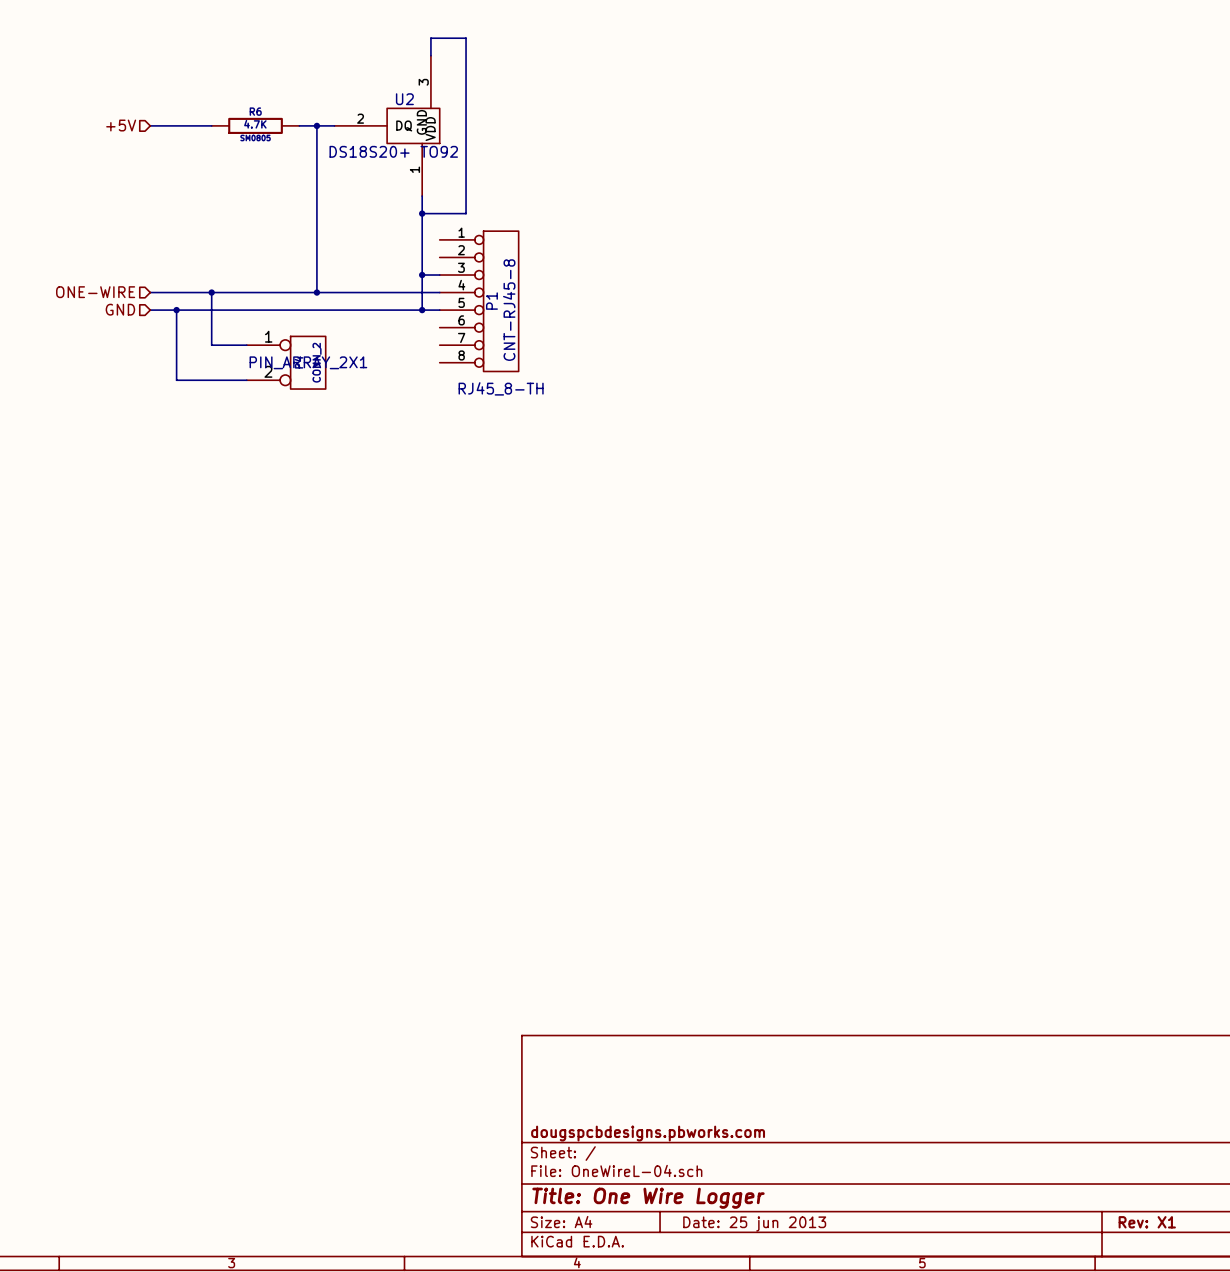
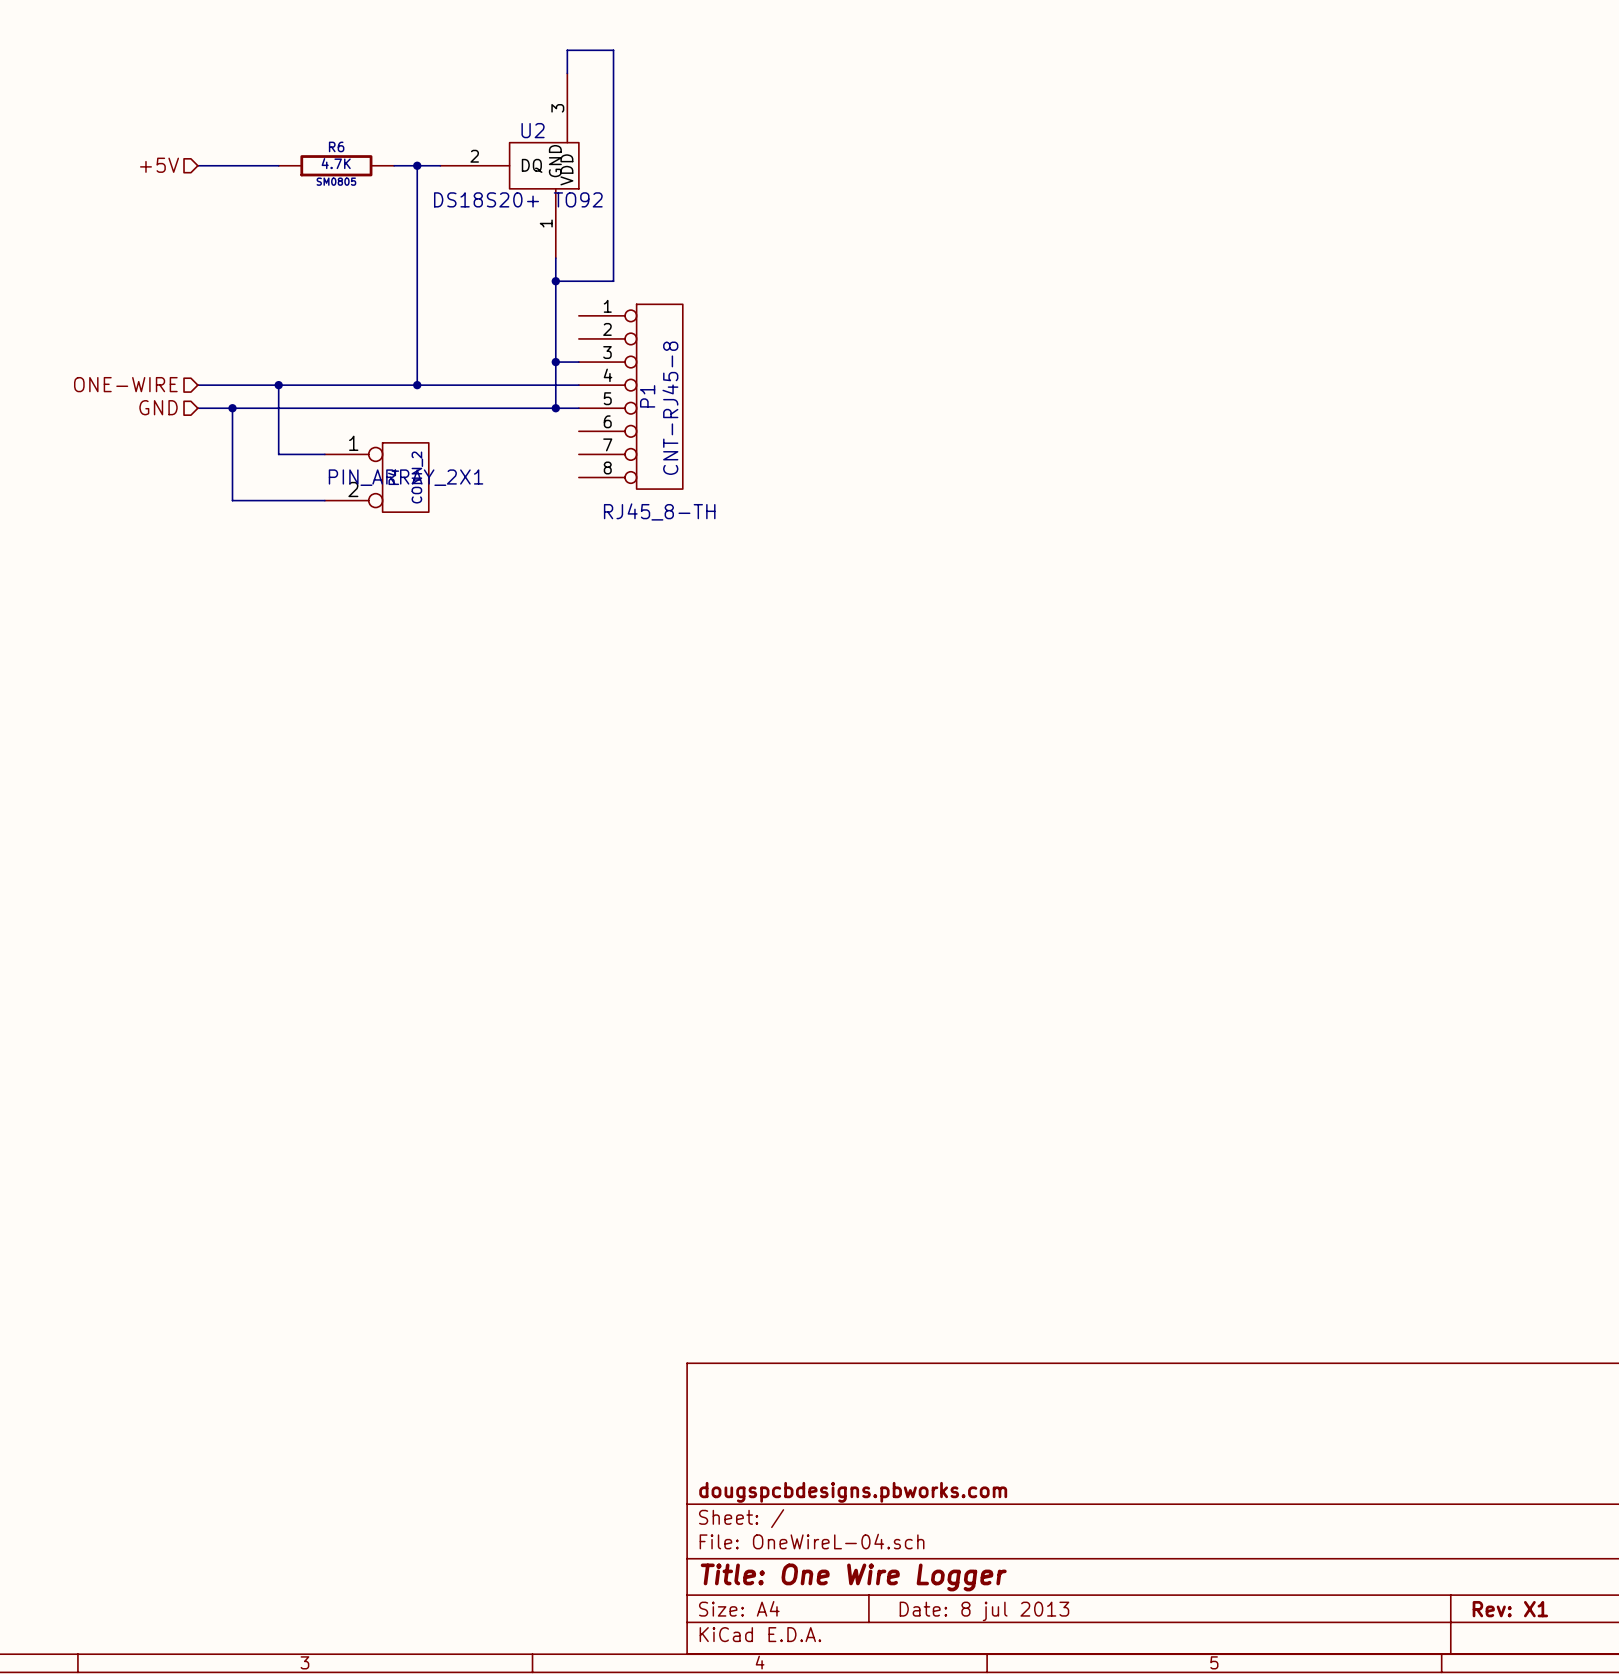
title block: Date: 25 jun 2013 (754, 1224) -> Date: 8 jul 2013 (984, 1611)

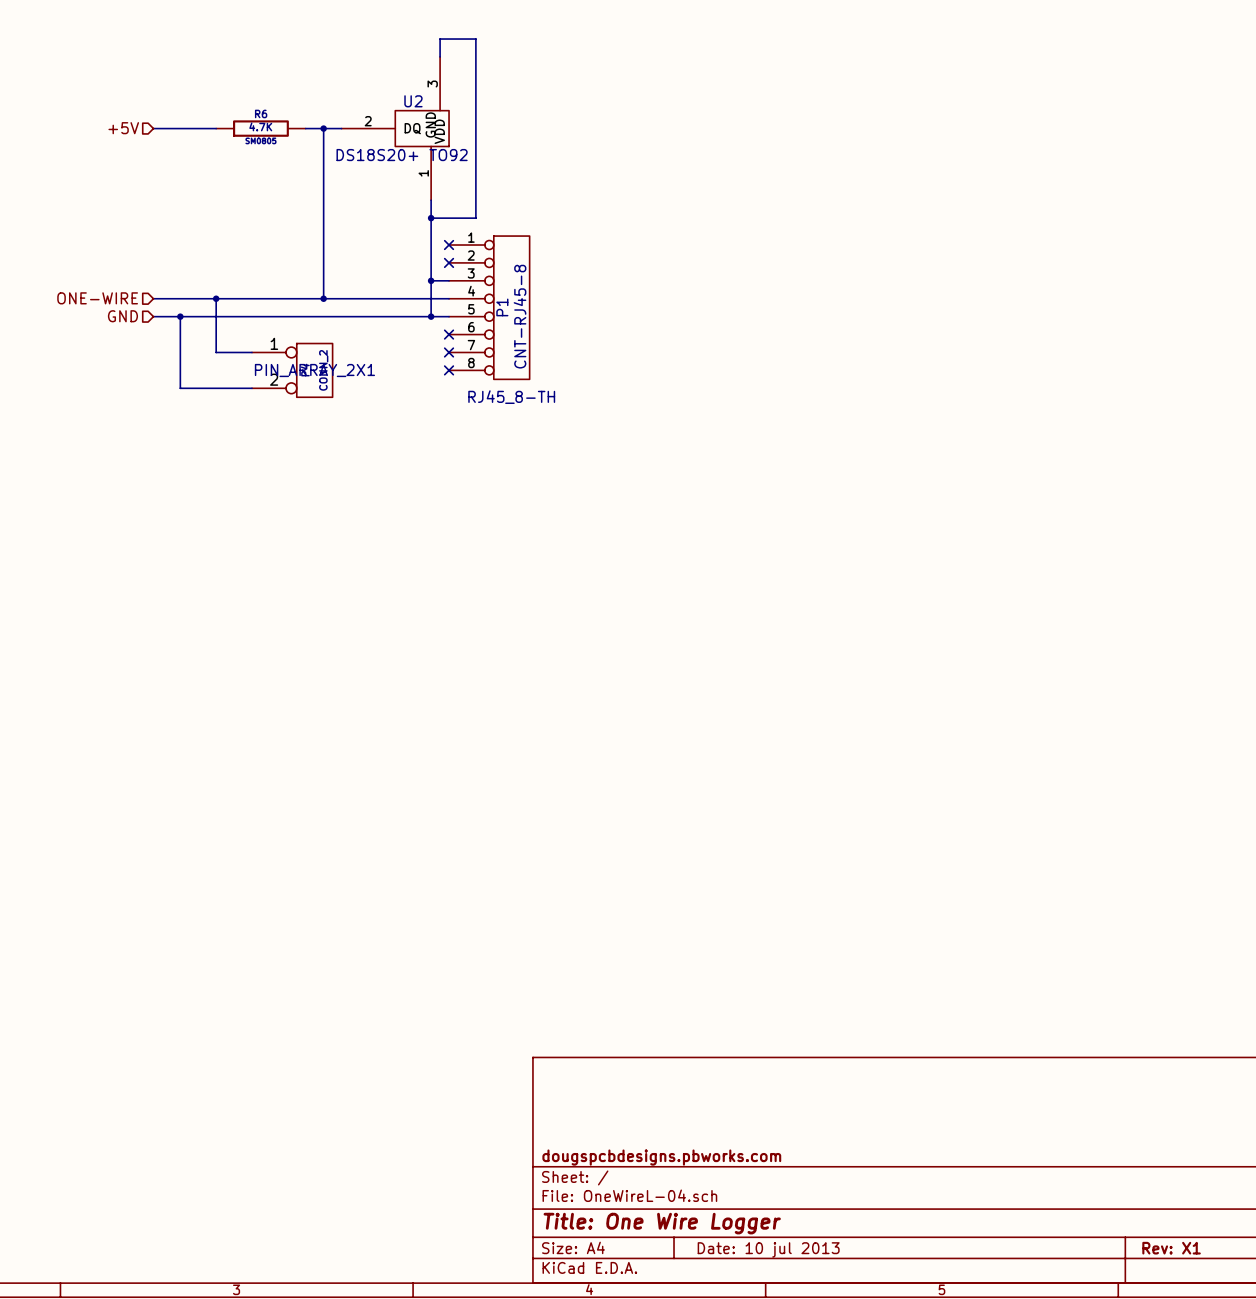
no-connect mark: none -> (449, 245)
no-connect mark: none -> (449, 262)
no-connect mark: none -> (449, 334)
no-connect mark: none -> (449, 352)
no-connect mark: none -> (449, 370)
title block: Date: 8 jul 2013 (984, 1611) -> Date: 10 jul 2013 (768, 1249)

